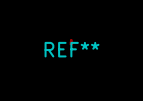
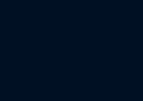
REF**: (71, 42) -> none

